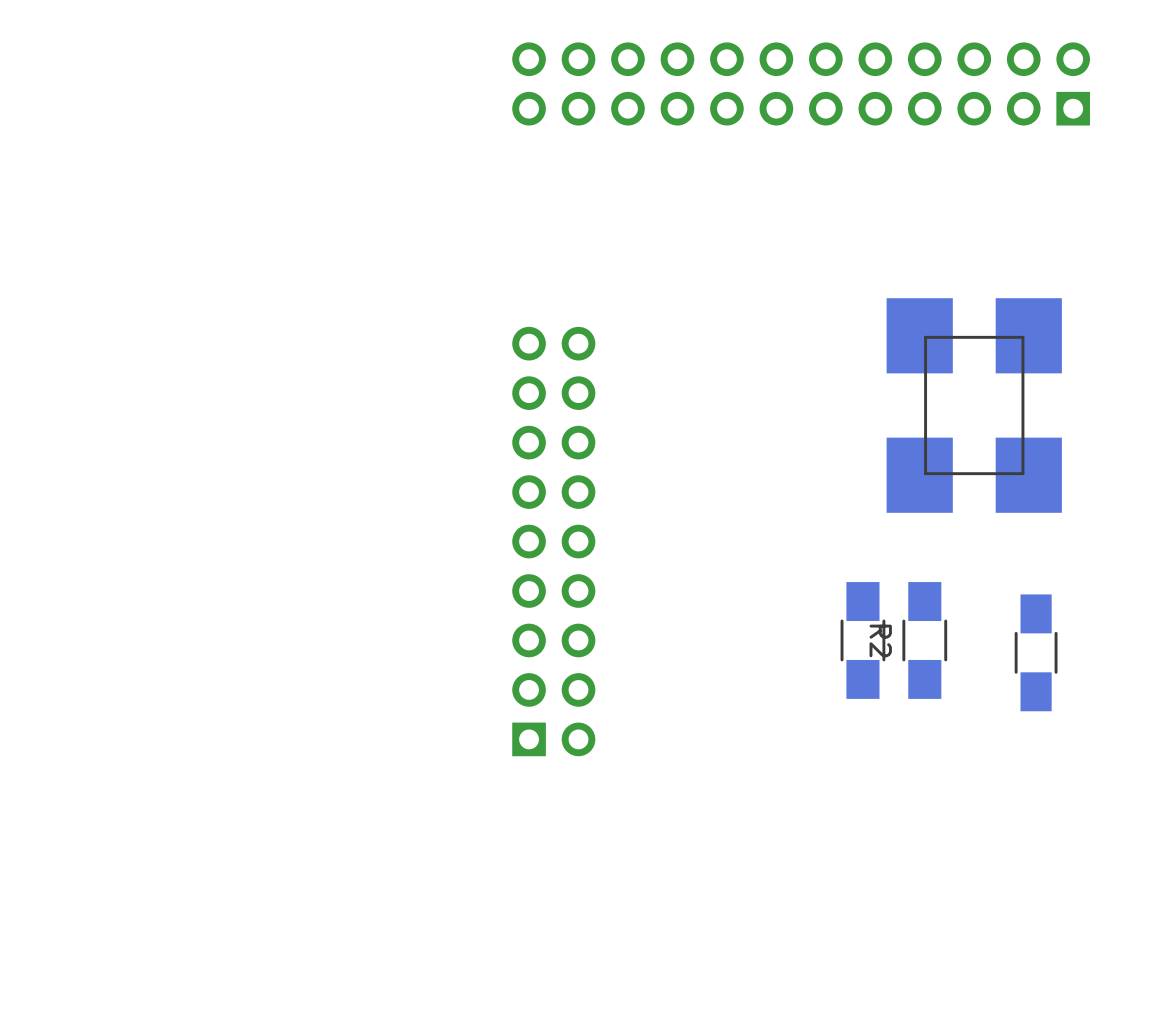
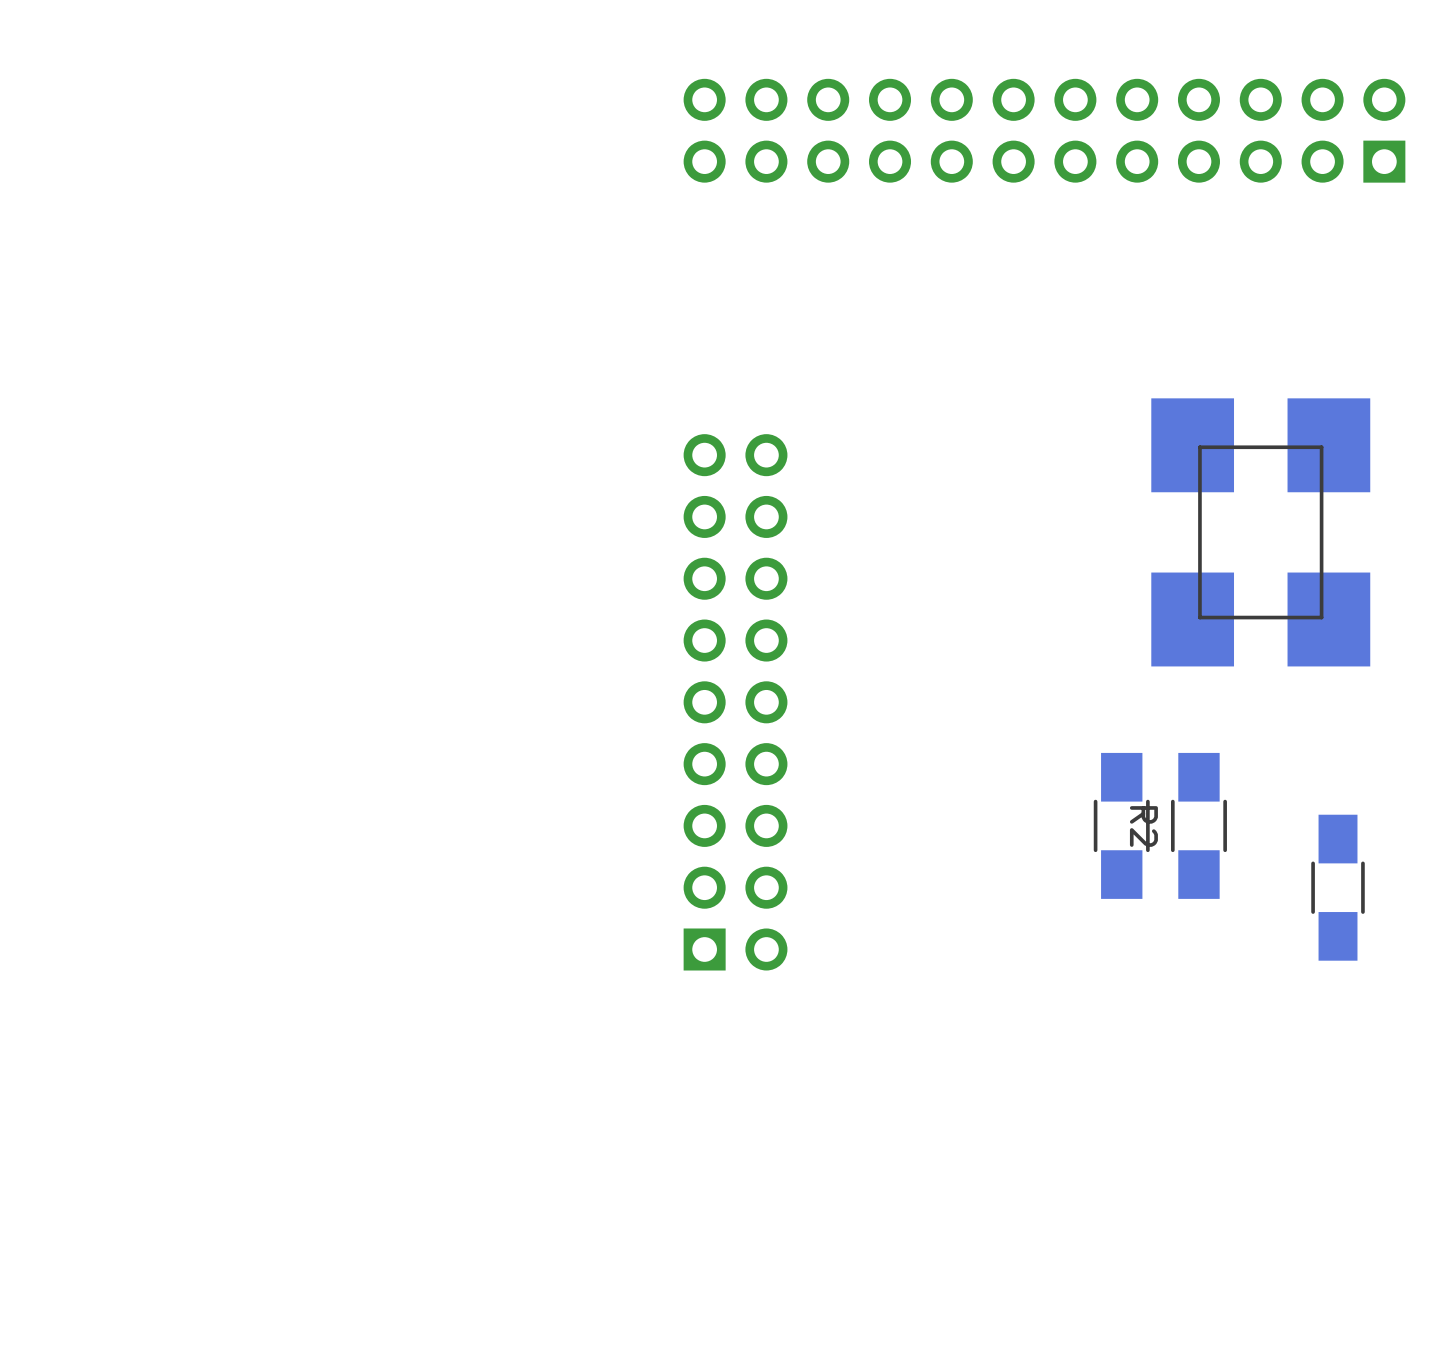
part position: (1036, 652) -> (1338, 887)

